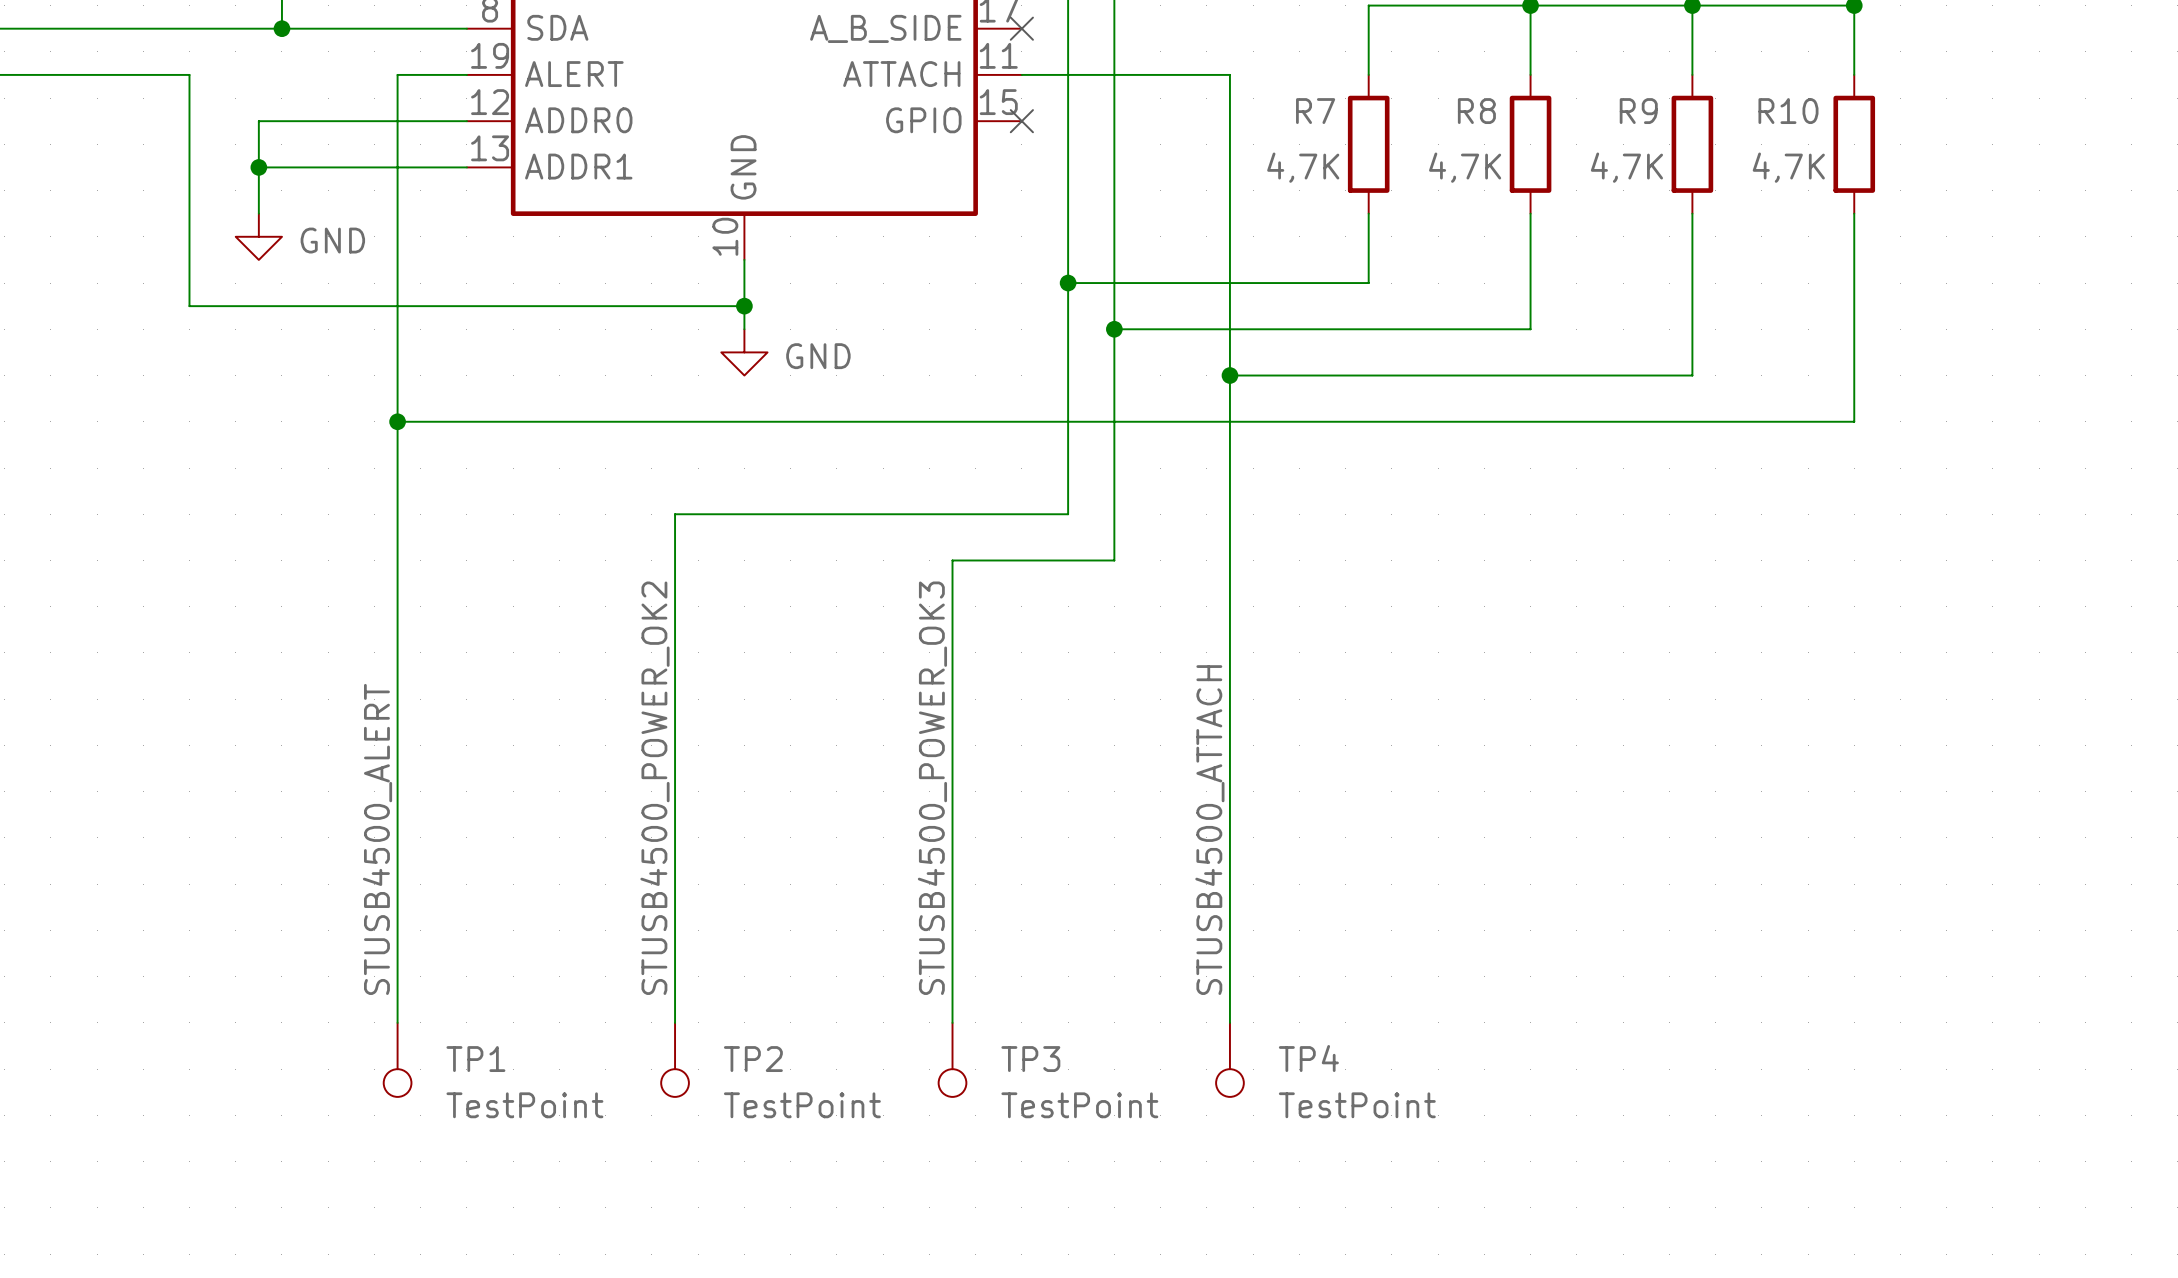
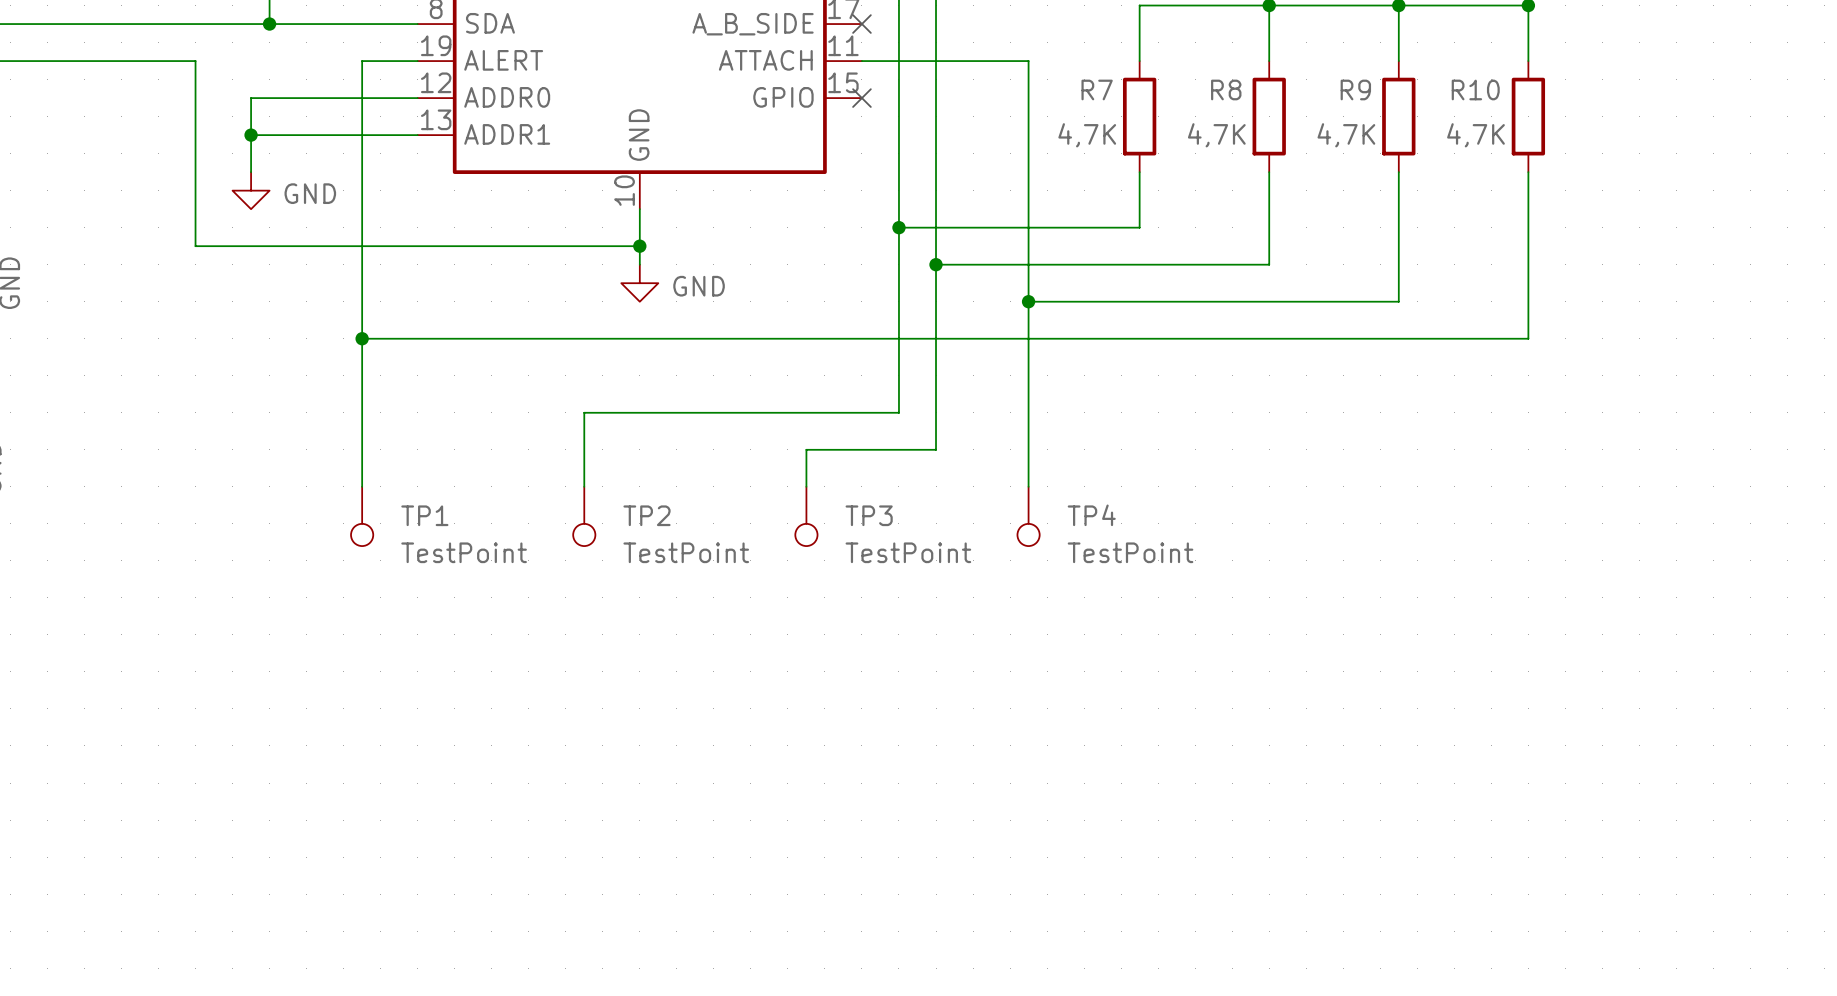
wire: (397, 606) (397, 1022) -> none
wire: (675, 606) (675, 1022) -> none
wire: (952, 606) (952, 1022) -> none
wire: (1229, 606) (1229, 1022) -> none
label: STUSB4500_POWER_OK2 (654, 788) -> none
label: STUSB4500_POWER_OK3 (932, 788) -> none
label: STUSB4500_ATTACH (1209, 830) -> none
label: STUSB4500_ALERT (377, 839) -> none
TP1 position: (397, 1059) -> (362, 516)
TP2 position: (675, 1059) -> (584, 516)
TP3 position: (952, 1059) -> (806, 516)
TP4 position: (1229, 1059) -> (1028, 516)

